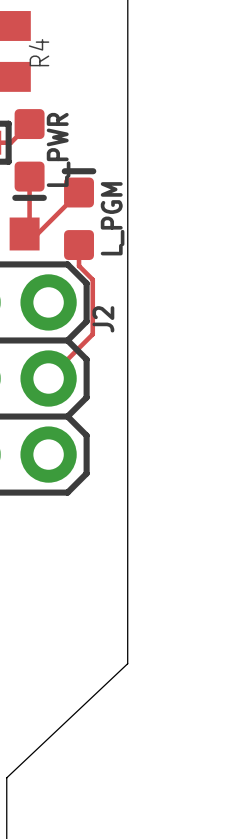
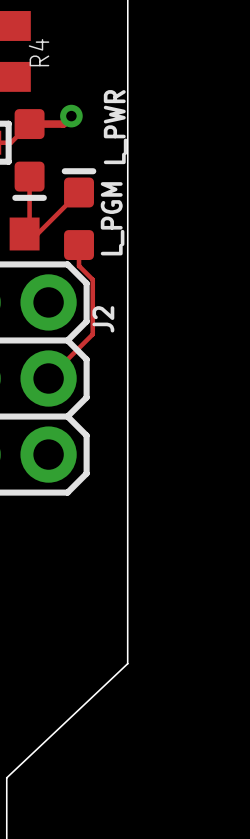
track: none -> (71, 116) (63, 124) (29, 124)
via: none -> (71, 116)
L_PWR name position: L_PWR (58, 149) -> L_PWR (115, 127)

